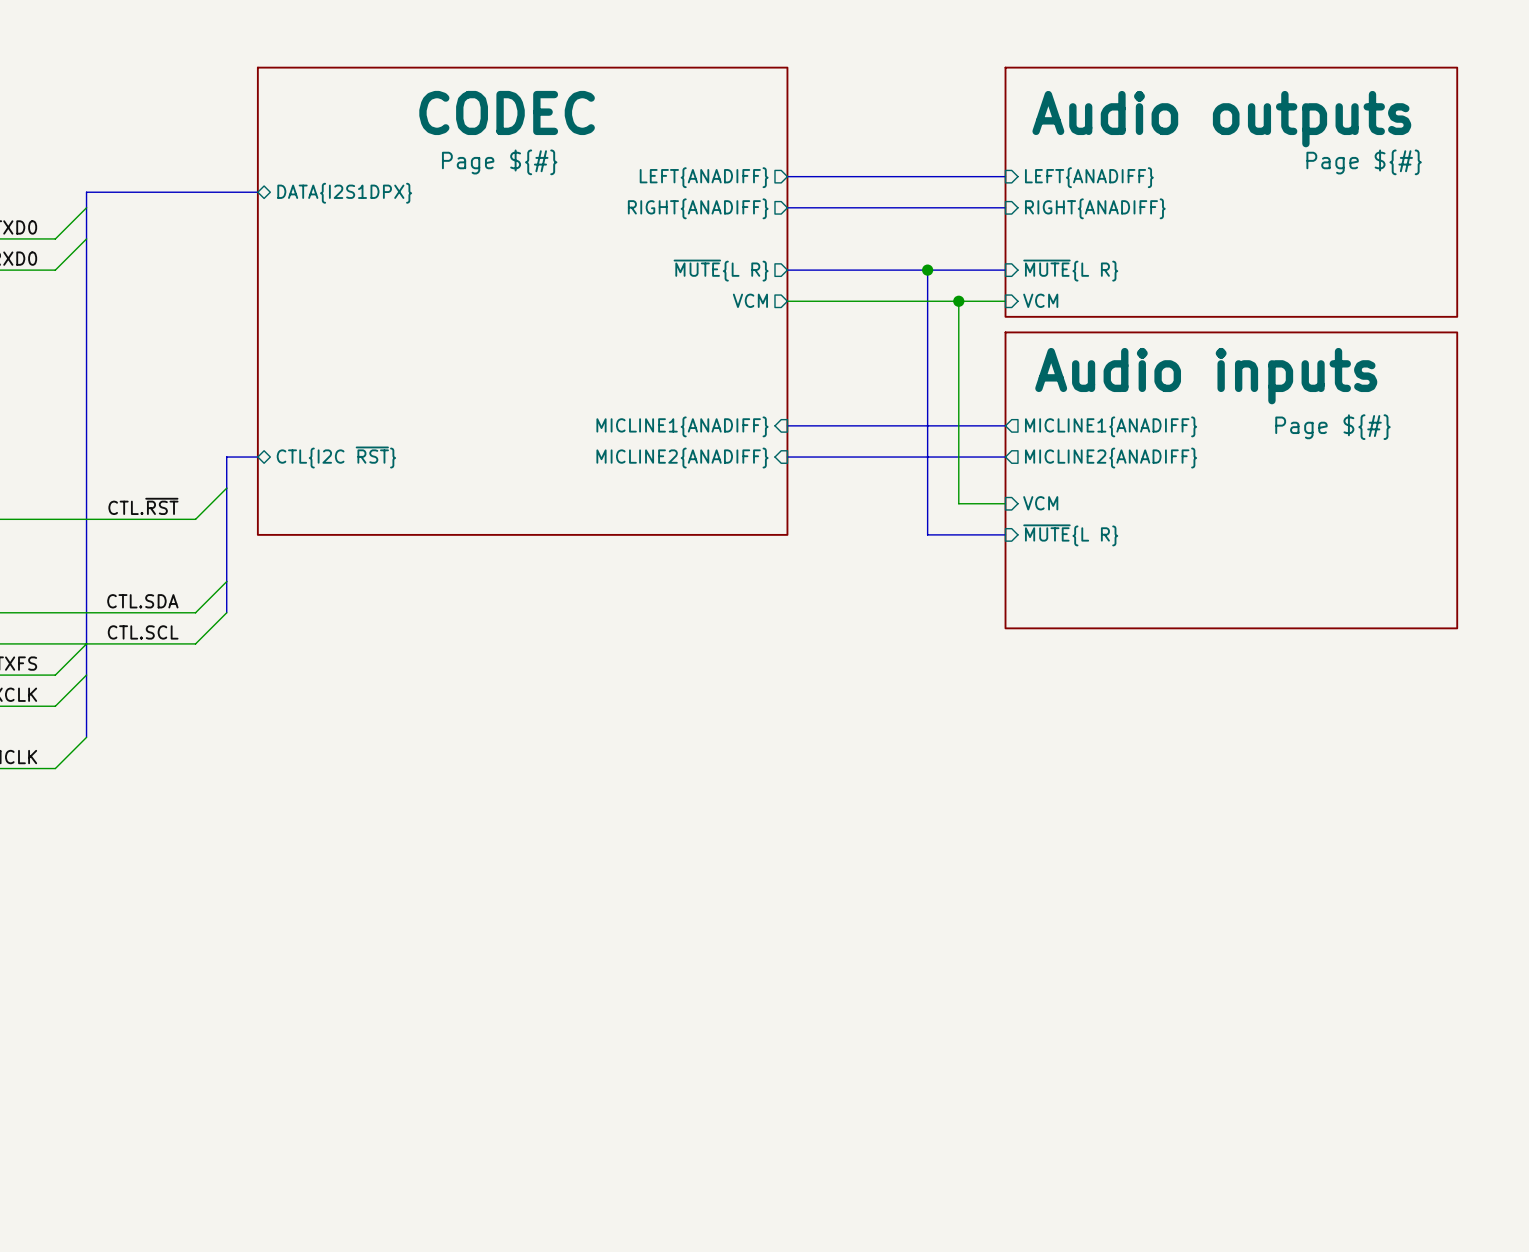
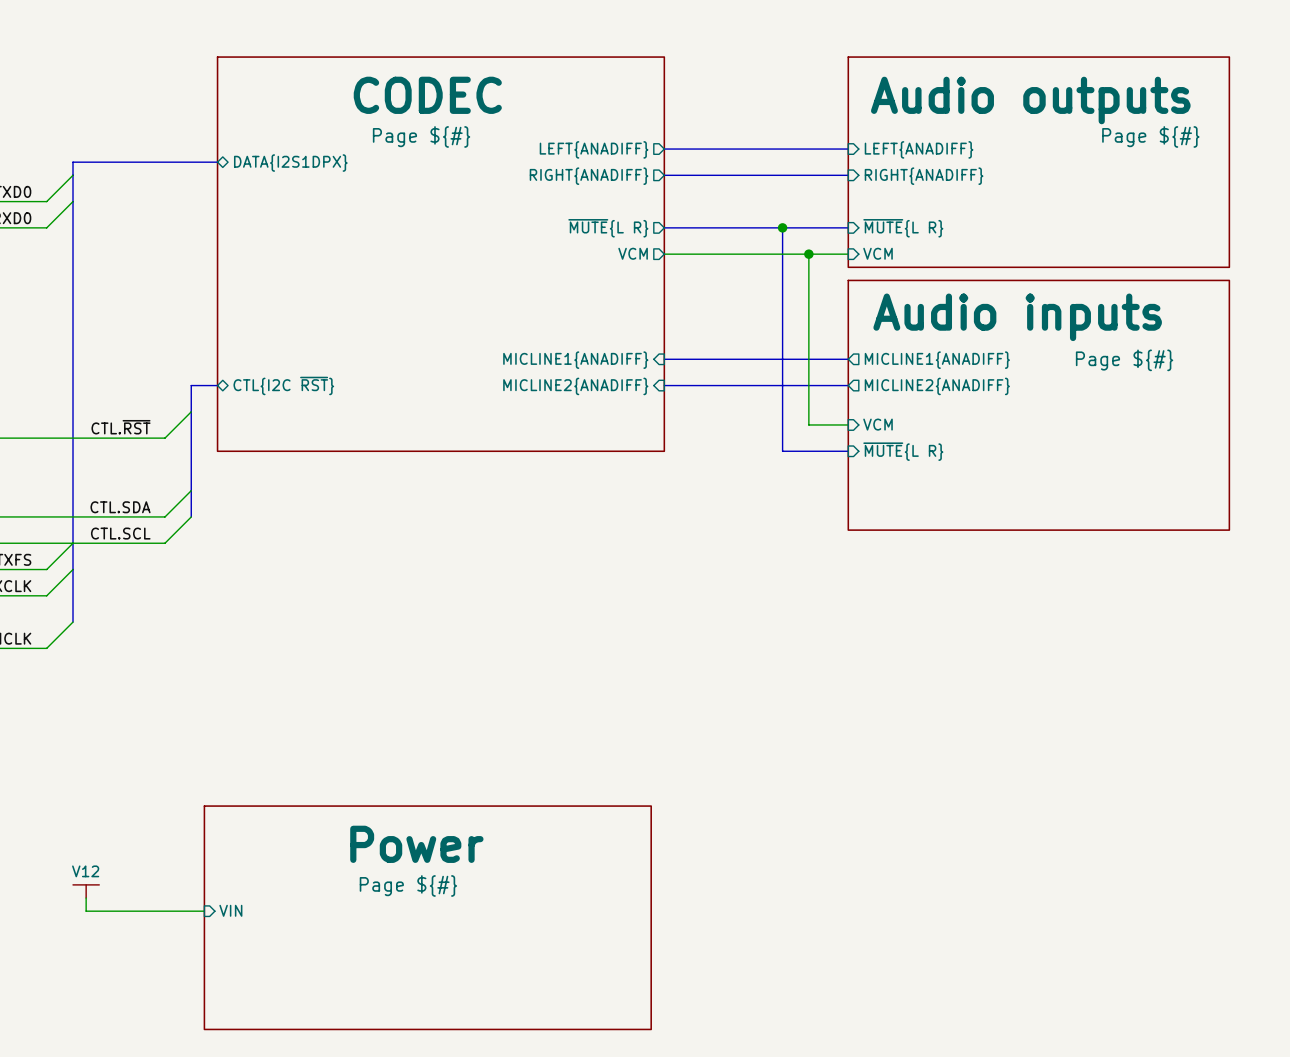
power symbol: none -> V12 (86, 891)
wire: none -> (86, 898) (86, 911) (204, 911)
sheet pin: none -> VIN (230, 910)
sheet Power: none -> (427, 917)

